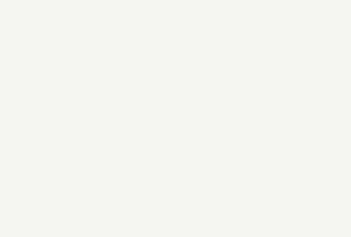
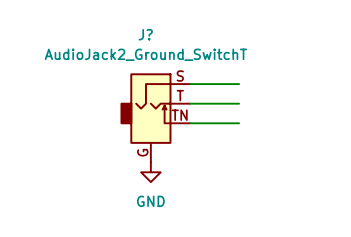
wire: none -> (190, 84) (239, 84)
wire: none -> (190, 103) (239, 103)
J?: none -> AudioJack2_Ground_SwitchT (155, 117)
wire: none -> (190, 123) (239, 123)
power symbol: none -> GND (150, 172)

